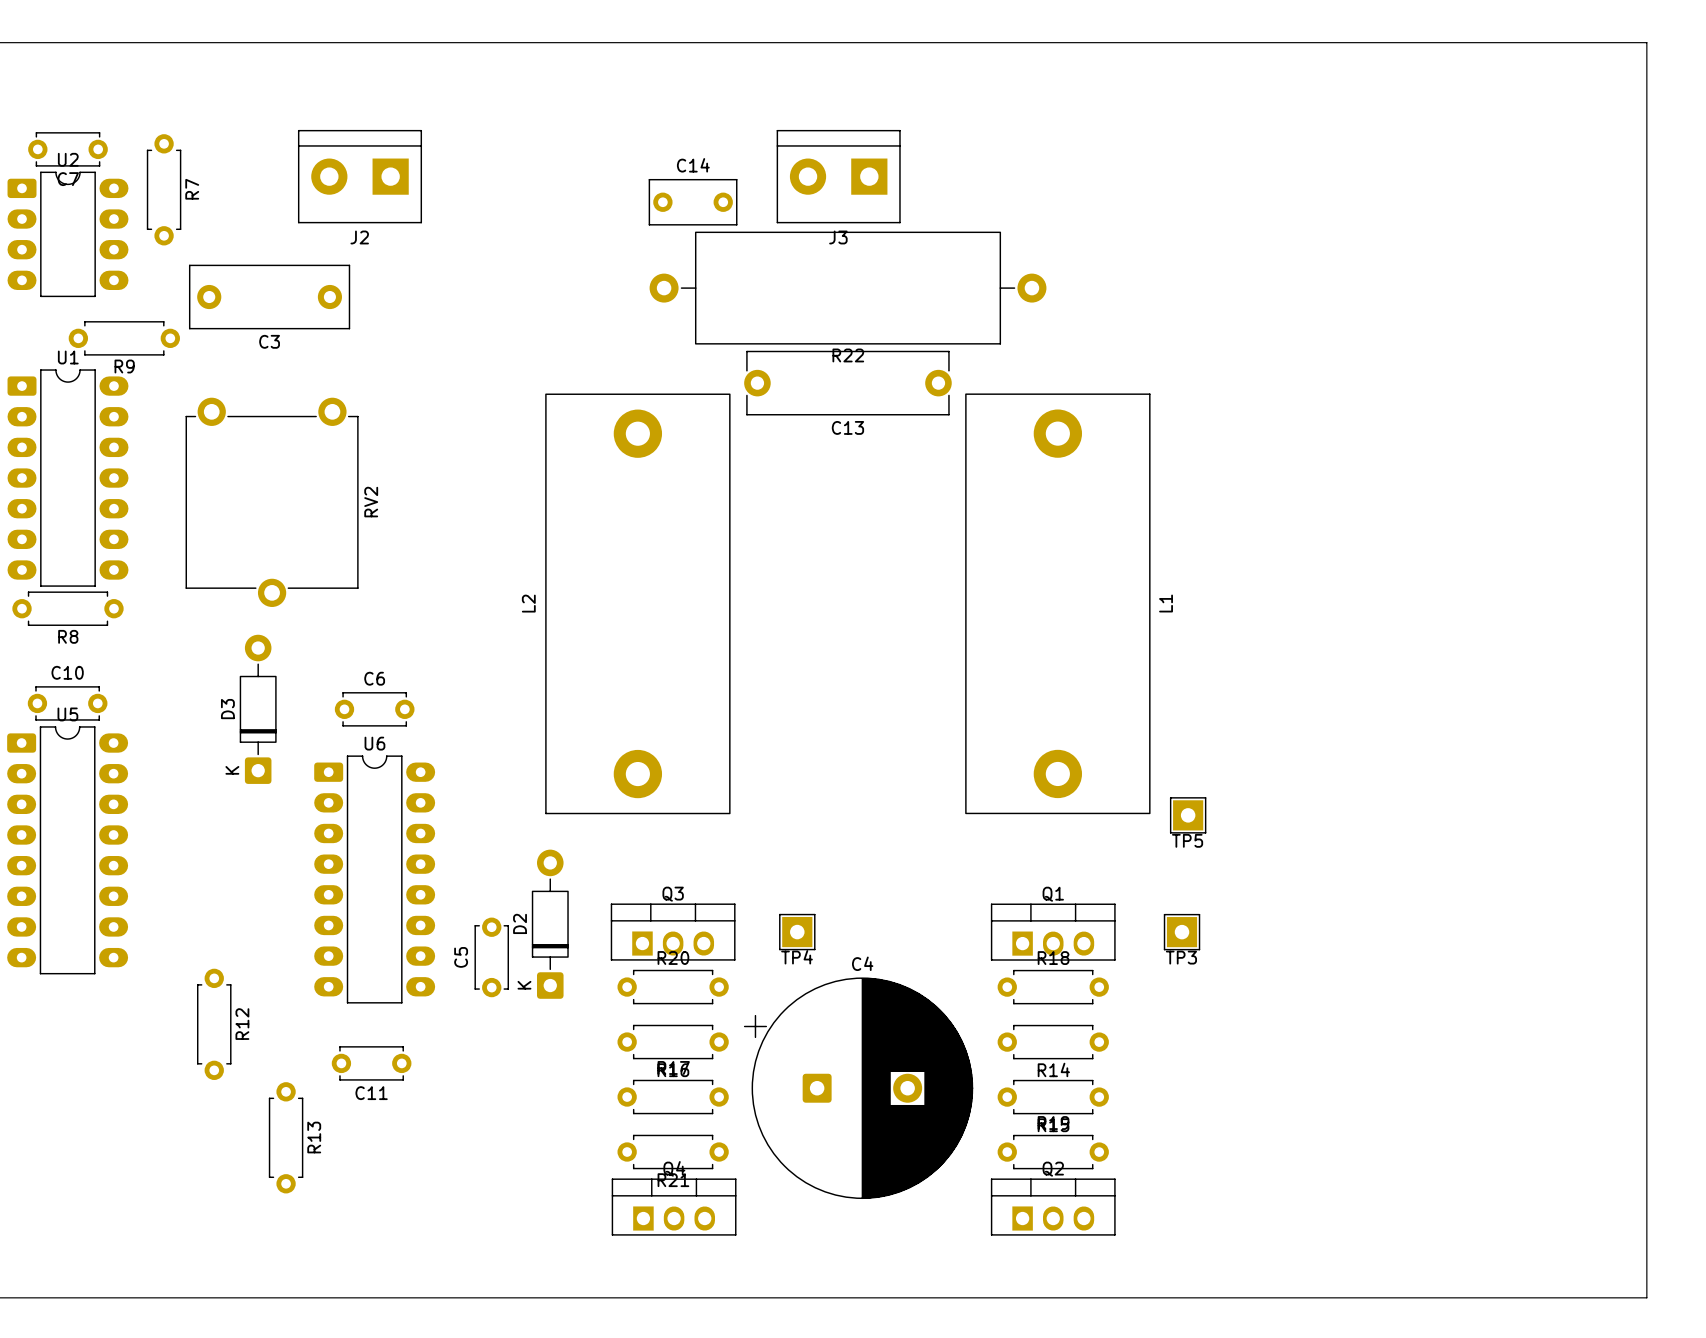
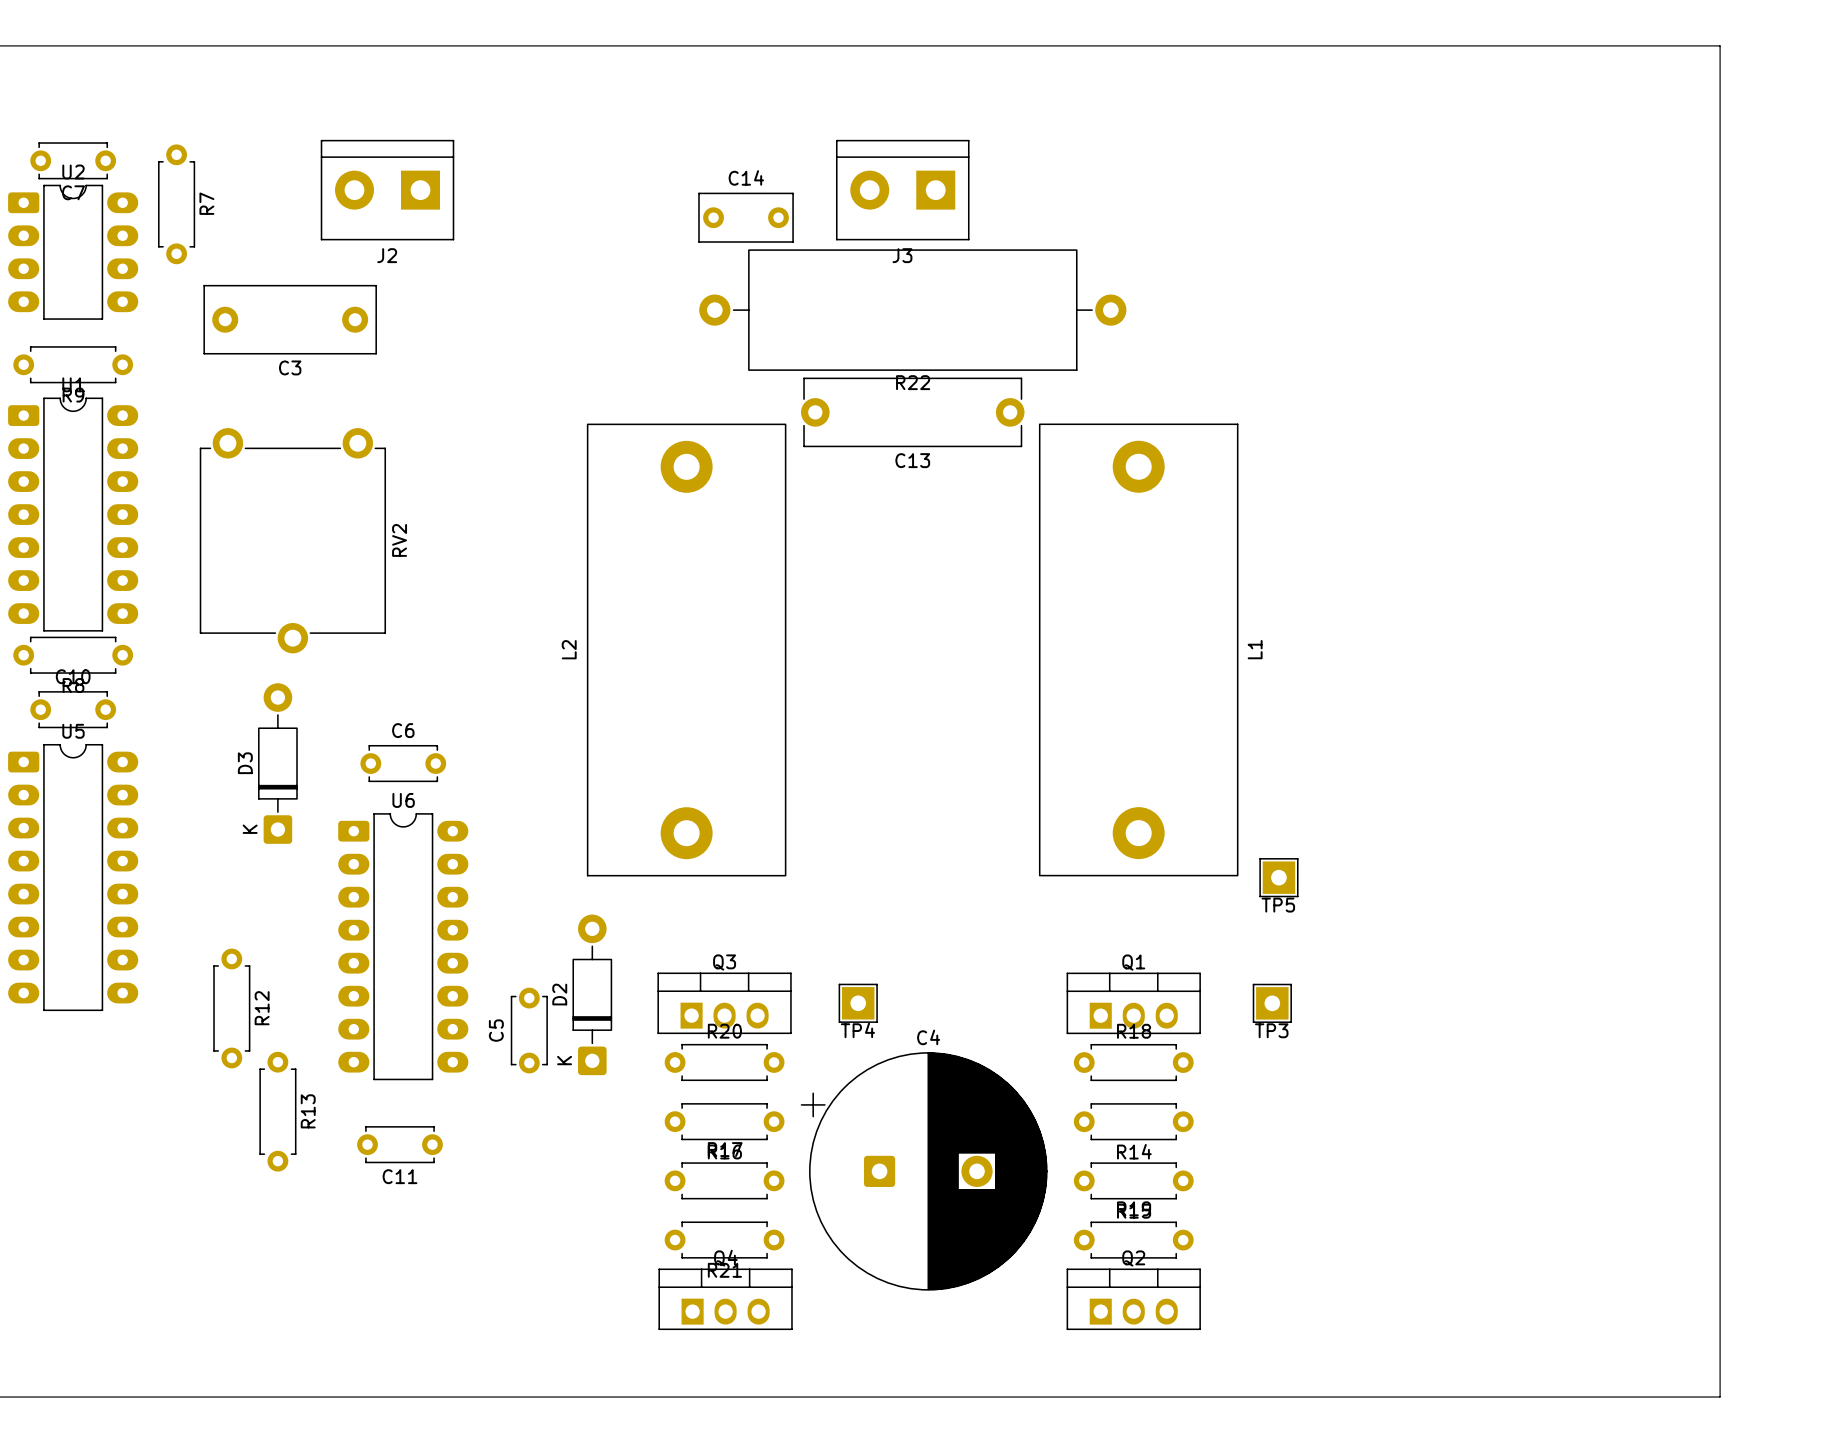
board edge: (1597, 42) (1646, 42) (1646, 1297) (1597, 1297) -> (1720, 45) (1720, 1397)
R9 position: (124, 338) -> (73, 364)
C10 position: (67, 703) -> (73, 709)
U5 position: (67, 850) -> (73, 877)
R12 position: (214, 1024) -> (231, 1008)
R13 position: (286, 1137) -> (277, 1111)

